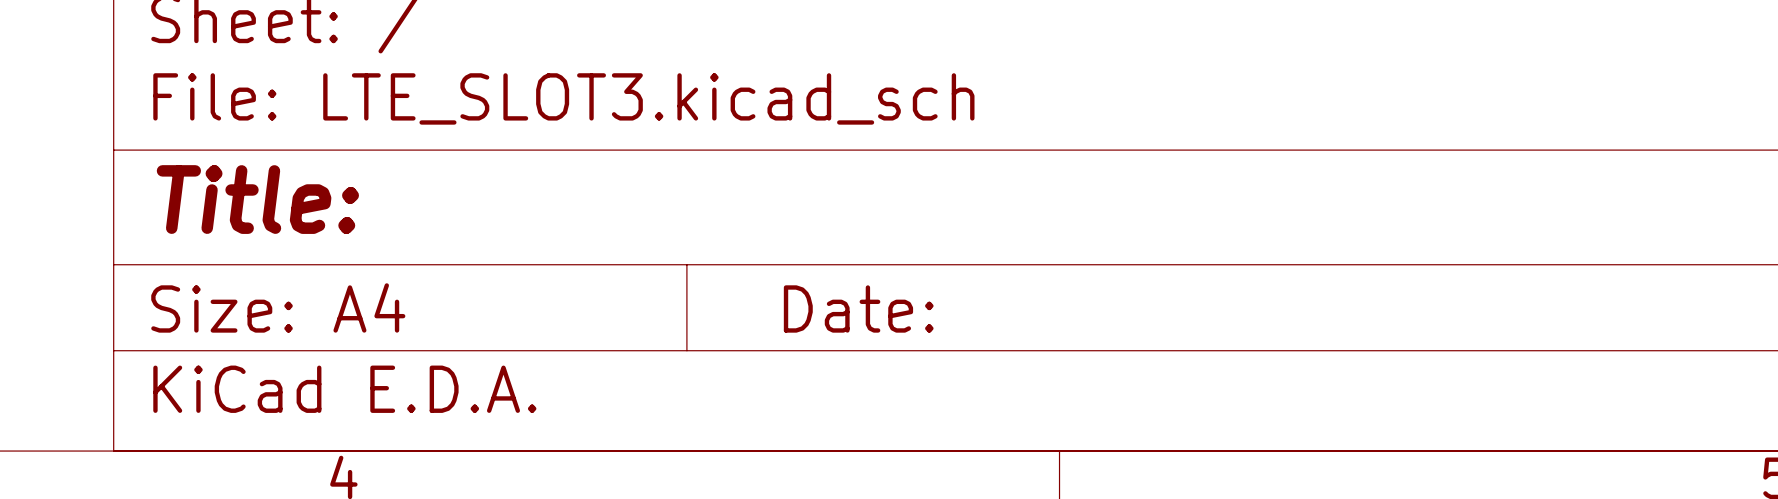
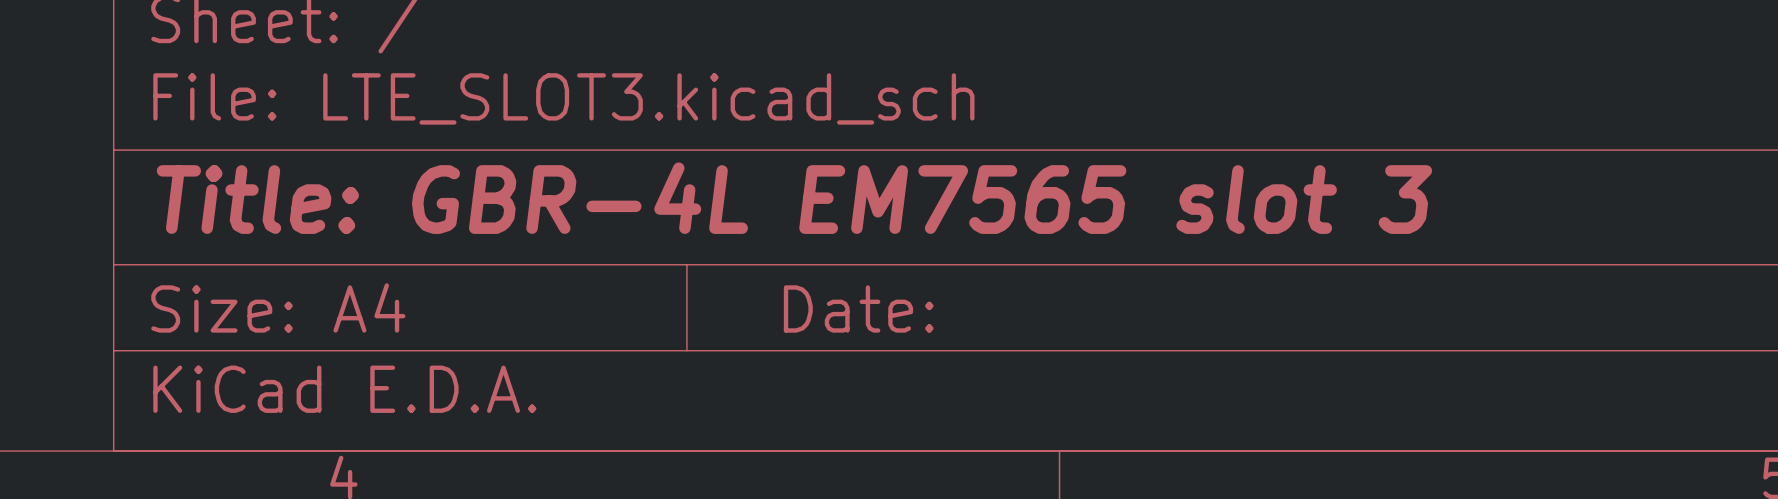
title block: Title: (257, 199) -> Title: GBR-4L EM7565 slot 3 (794, 198)

